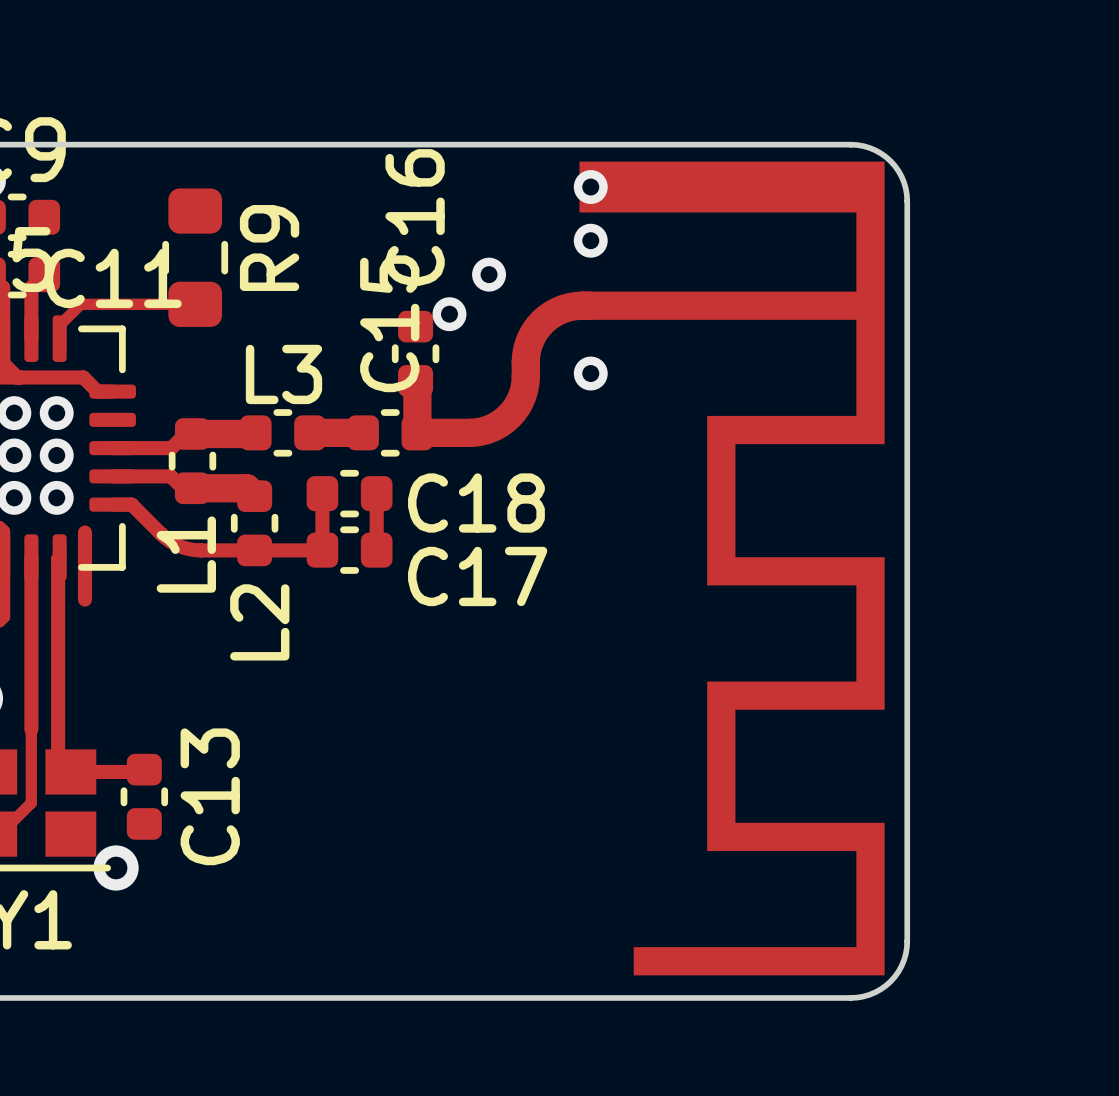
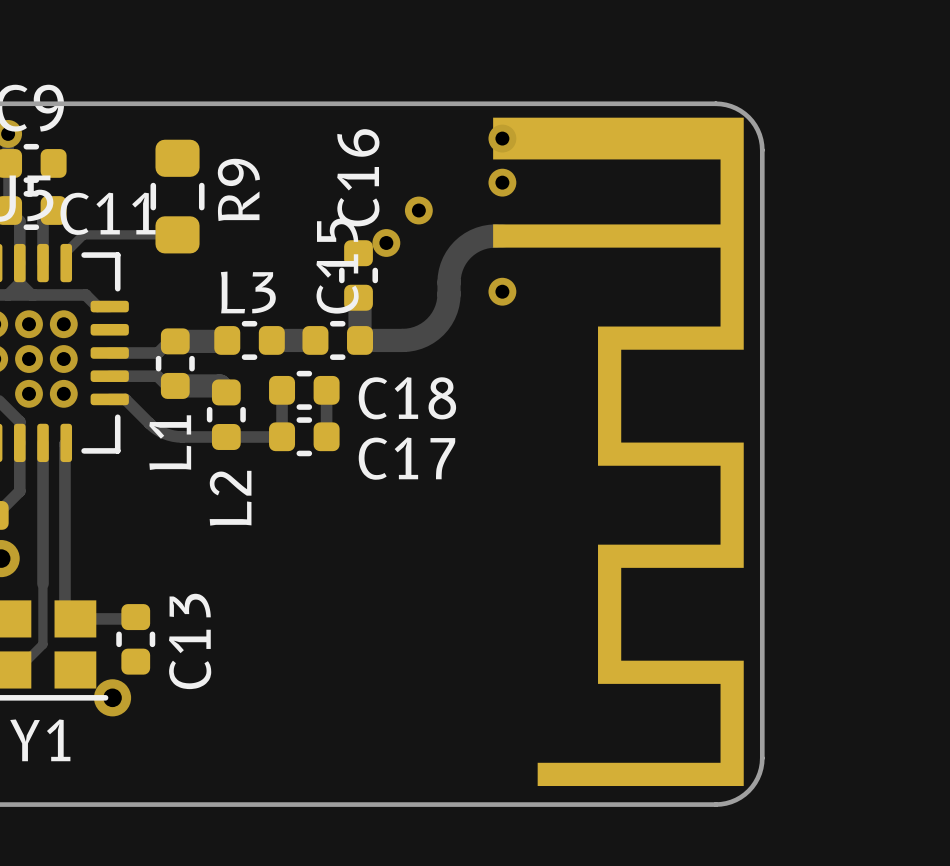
track: (84, 532) (84, 599) -> none

